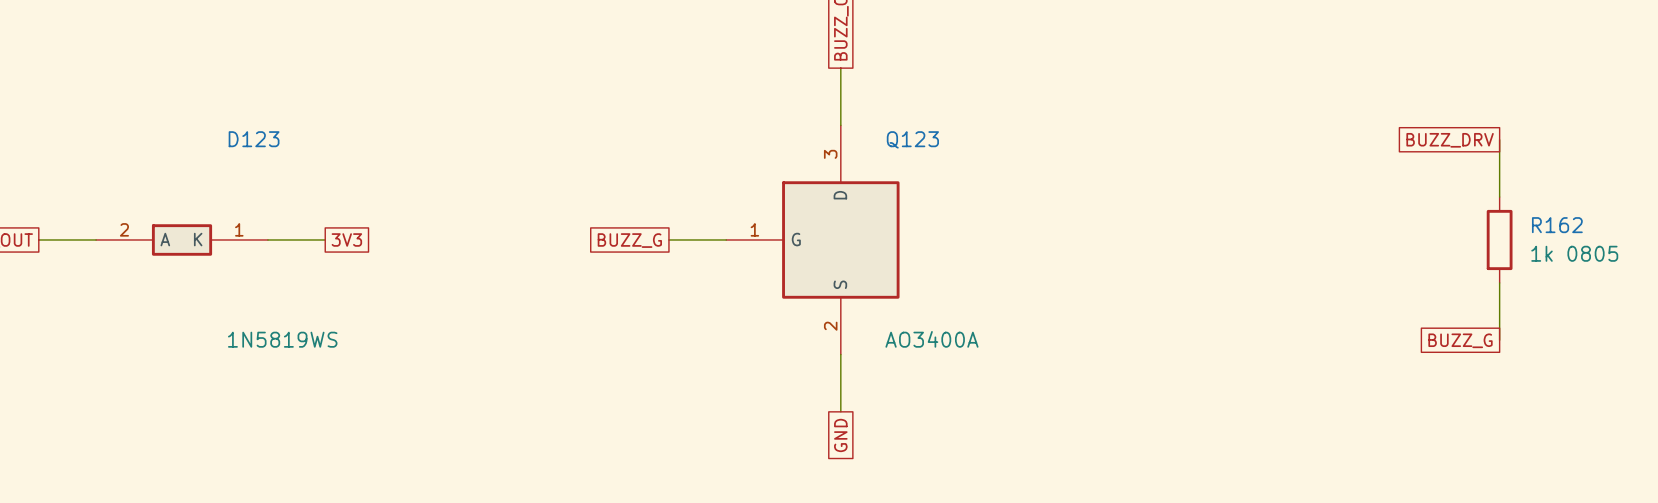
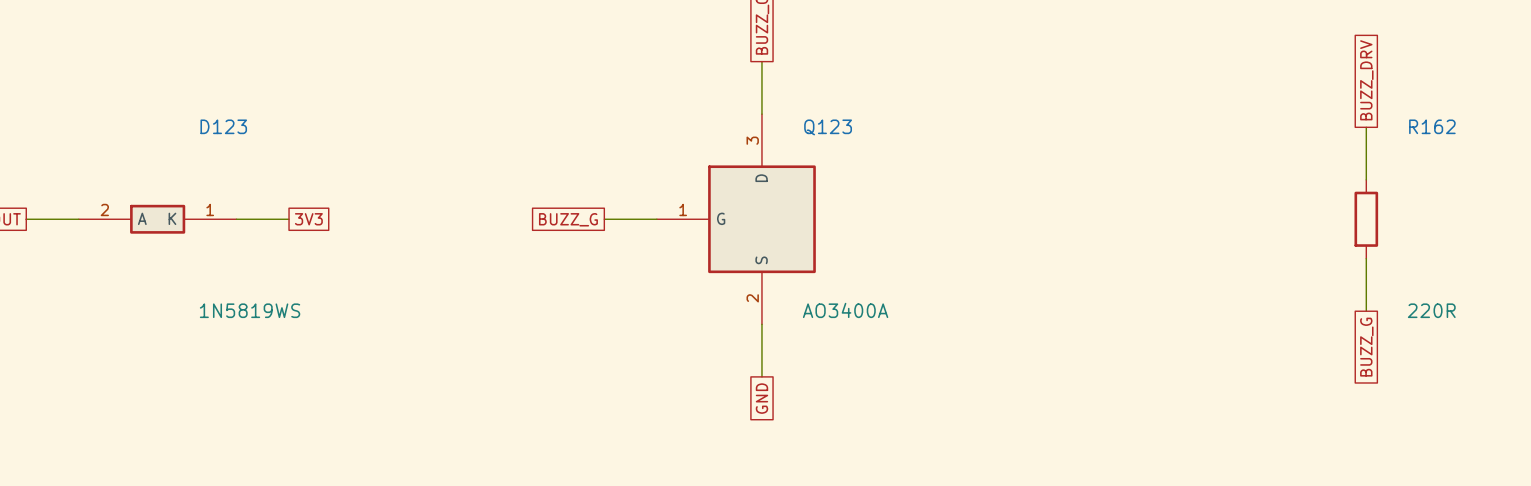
global label rotation: 0° (1450, 140) -> 90° clockwise (1366, 80)
R162 name position: R162 (1557, 225) -> R162 (1432, 126)
R162 value: 1k 0805 (1574, 253) -> 220R (1431, 310)
global label rotation: 0° (1460, 340) -> 90° counterclockwise (1366, 347)

